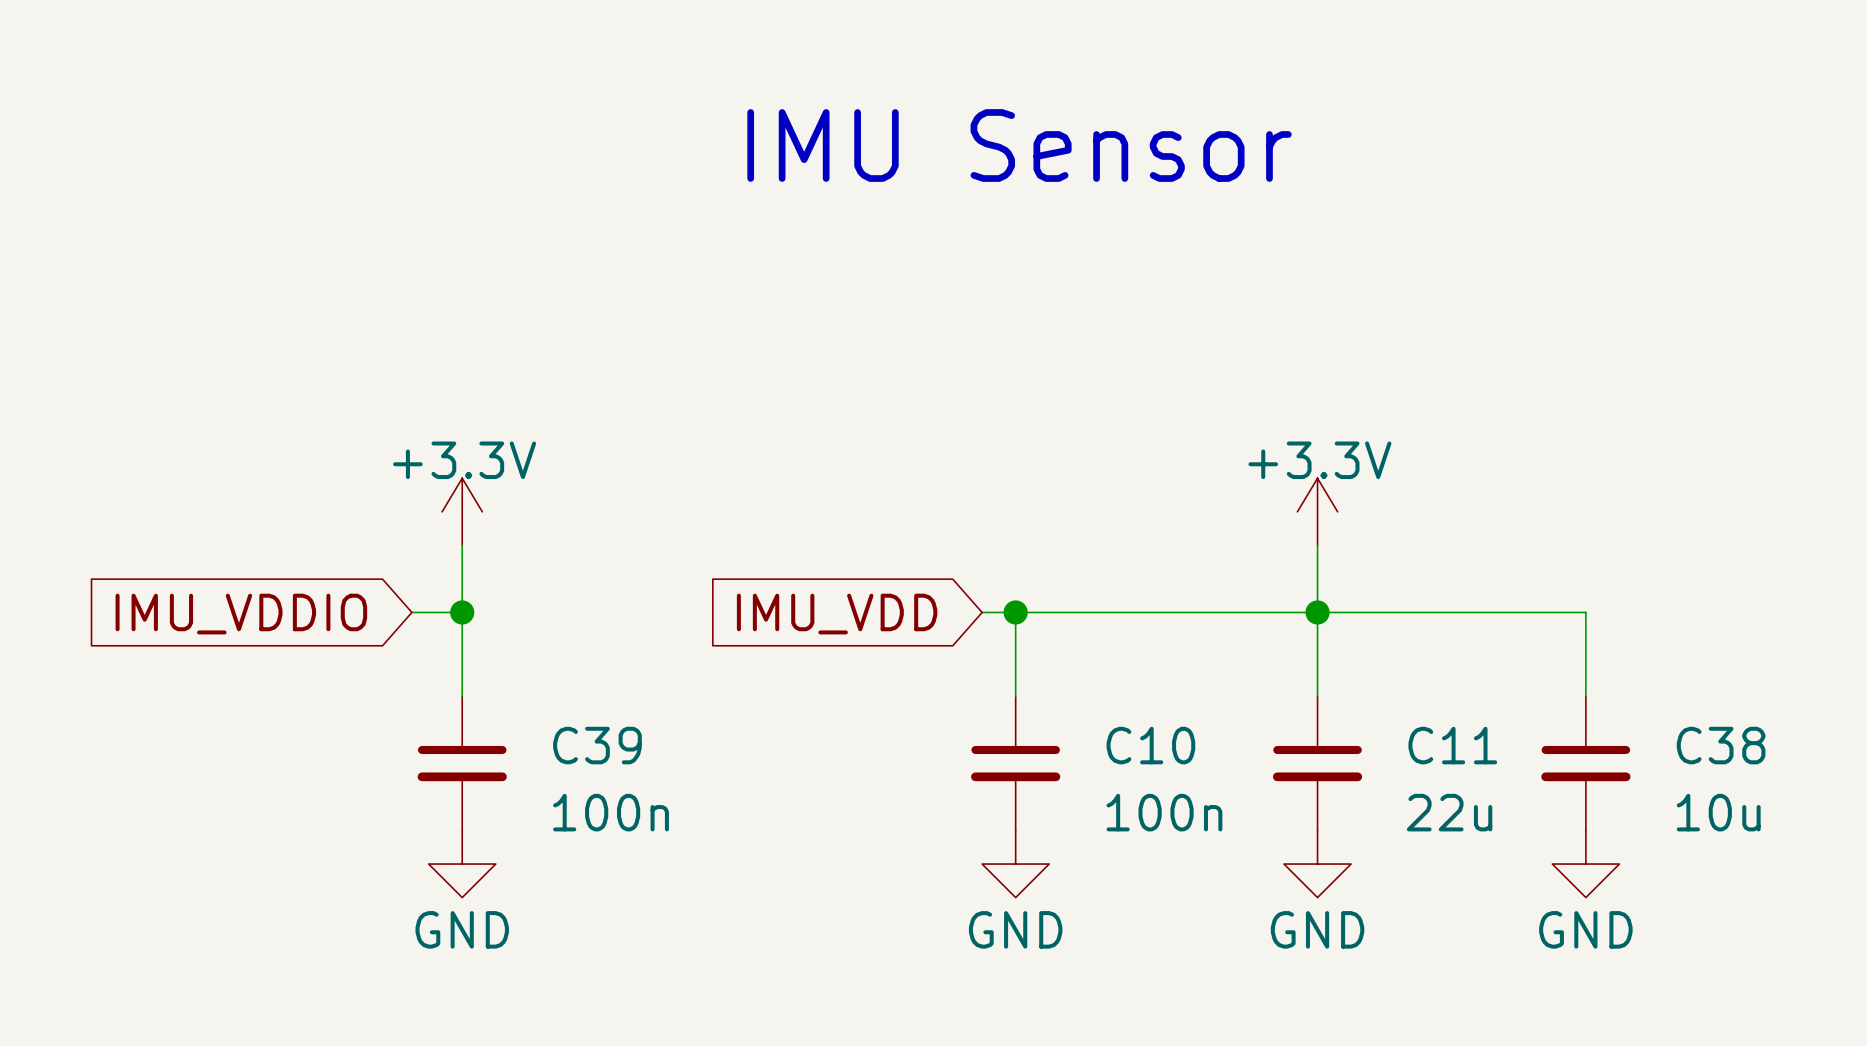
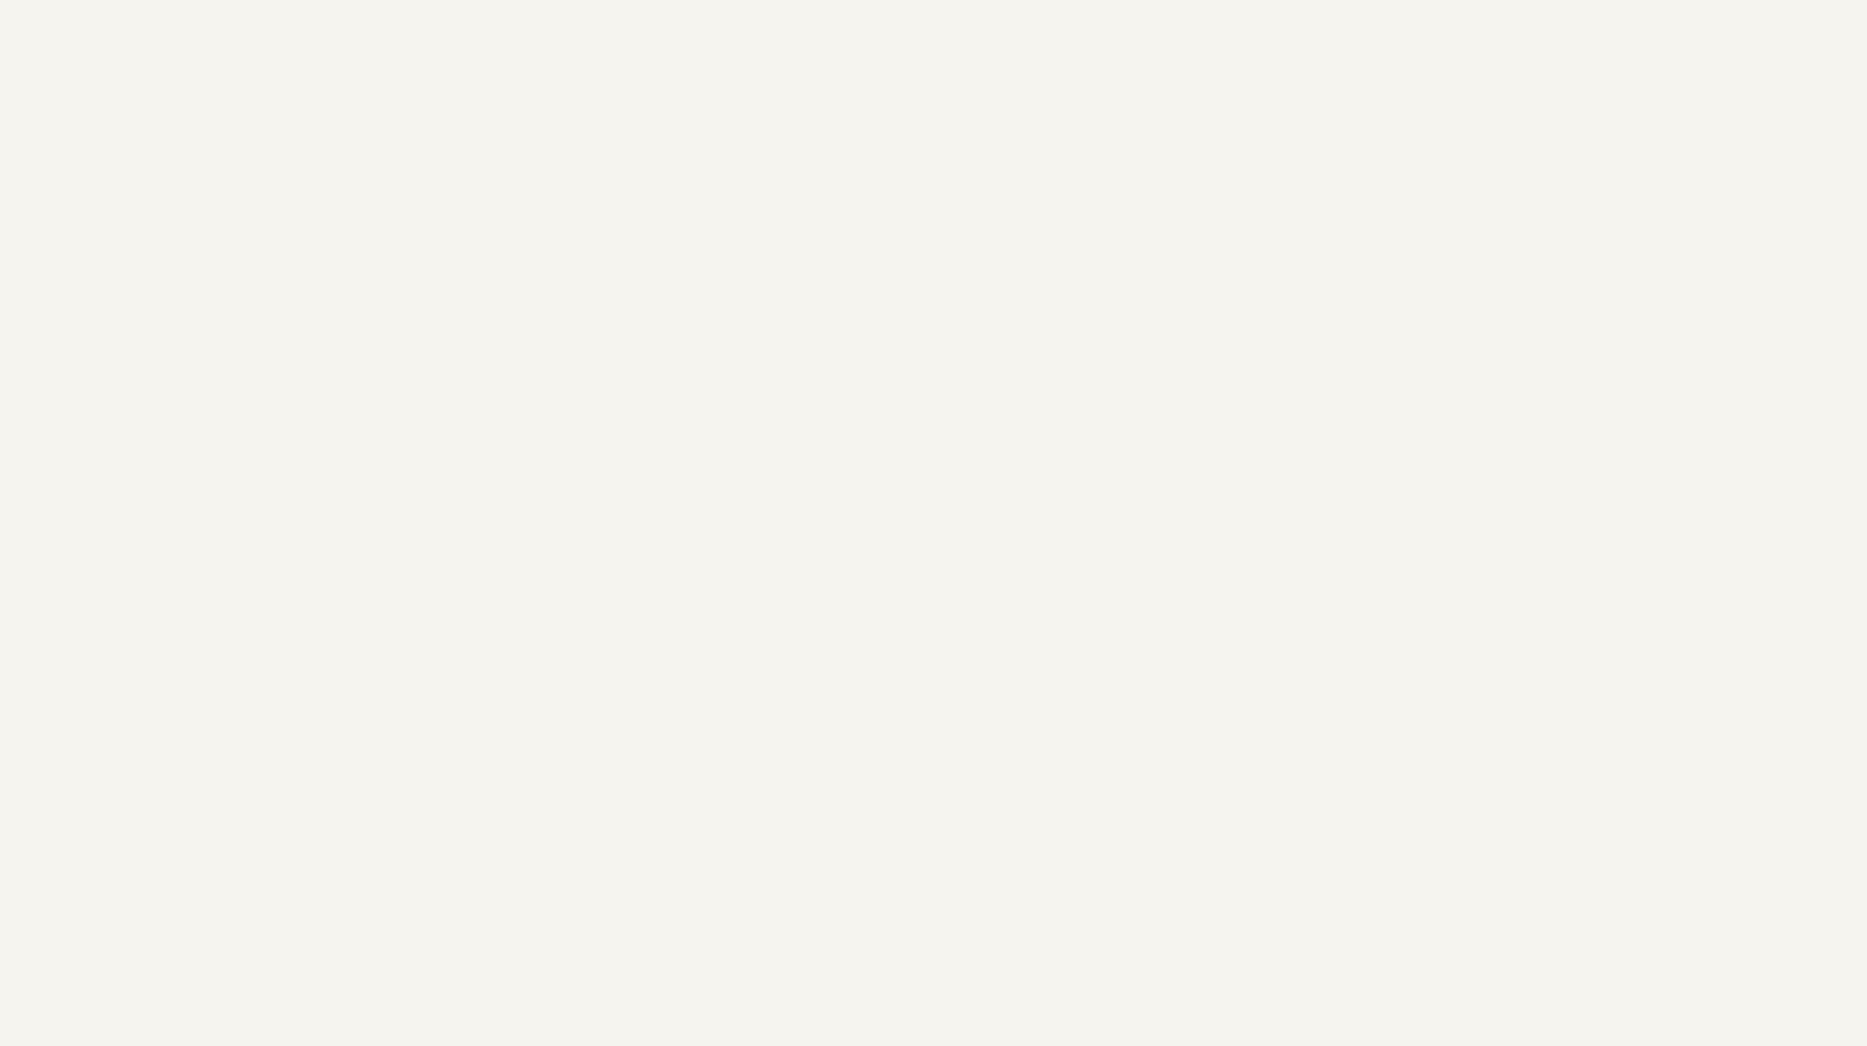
text: IMU Sensor (1019, 145) -> none
power symbol: +3.3V (462, 511) -> none
power symbol: +3.3V (1317, 511) -> none
wire: (462, 545) (462, 696) -> none
wire: (1317, 545) (1317, 696) -> none
wire: (411, 612) (462, 612) -> none
junction: (462, 612) -> none
wire: (982, 612) (1585, 612) (1585, 696) -> none
wire: (1015, 612) (1015, 696) -> none
junction: (1015, 612) -> none
junction: (1317, 612) -> none
global label: IMU_VDDIO (241, 614) -> none
global label: IMU_VDD (837, 614) -> none
C39: 100n (462, 763) -> none
C10: 100n (1015, 763) -> none
C11: 22u (1317, 763) -> none
C38: 10u (1585, 763) -> none
power symbol: GND (462, 864) -> none
power symbol: GND (1015, 864) -> none
power symbol: GND (1317, 864) -> none
power symbol: GND (1585, 864) -> none

